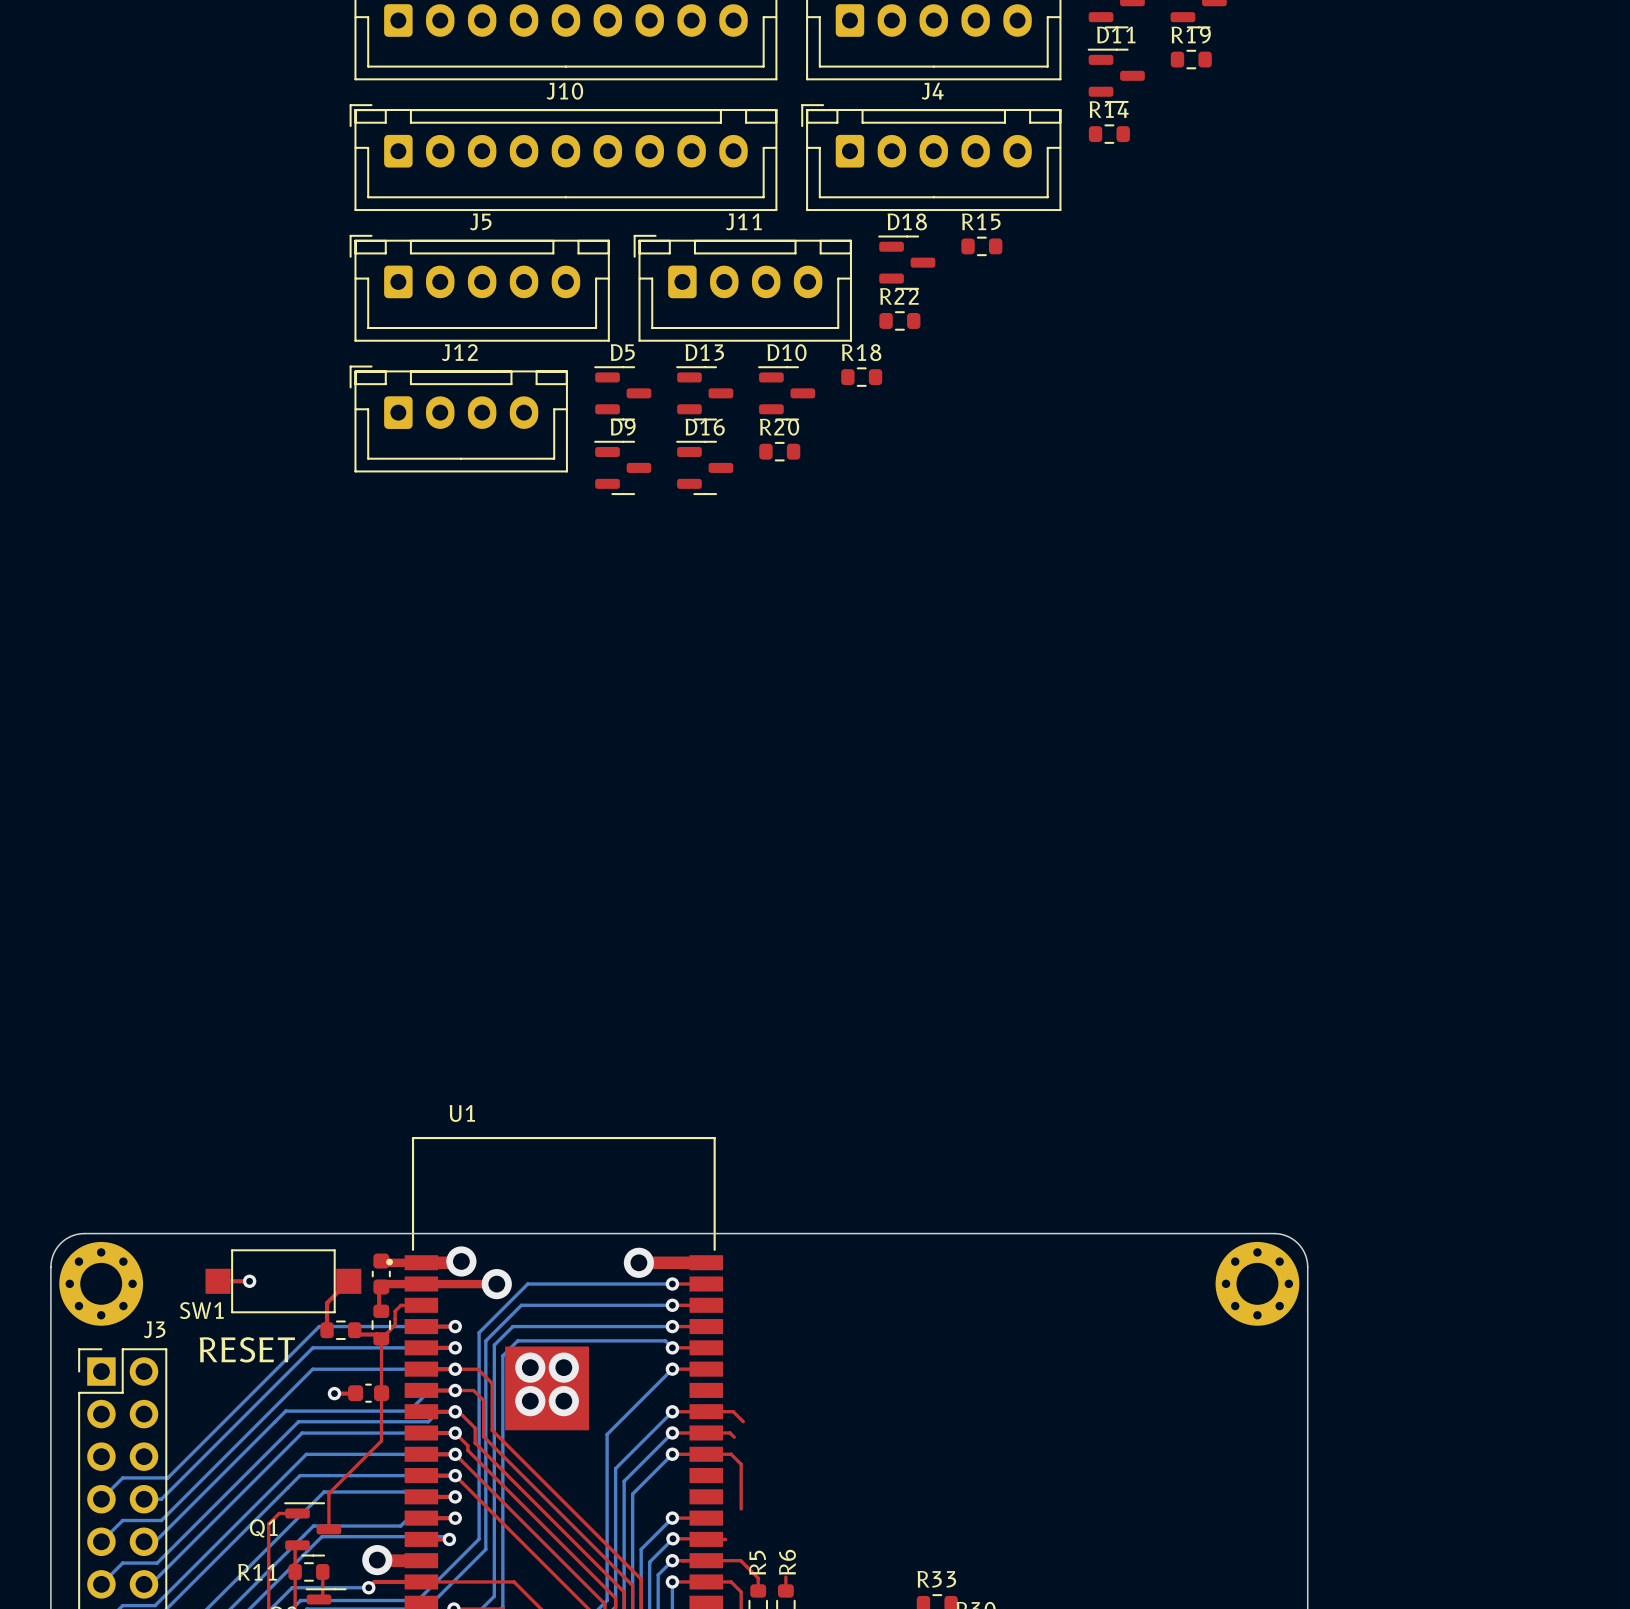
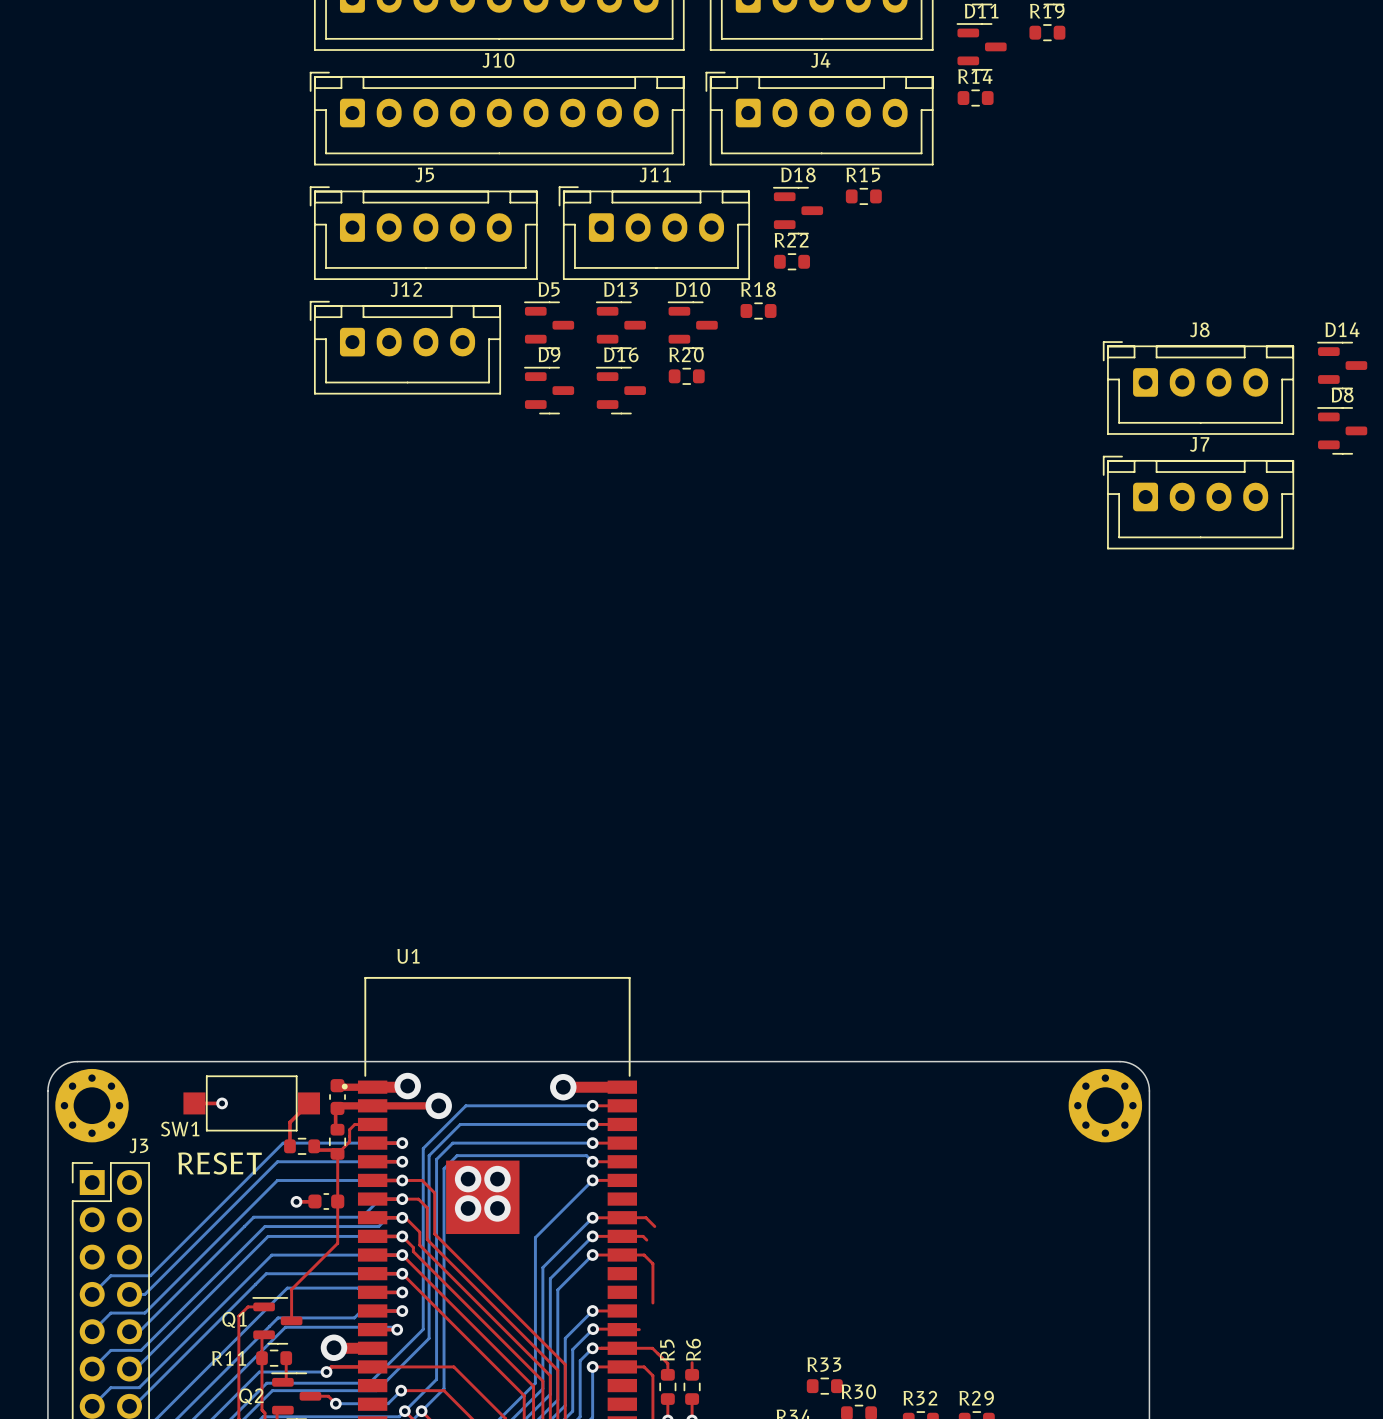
D14: none -> (1342, 365)
J8: none -> (1198, 388)
D8: none -> (1342, 430)
J7: none -> (1198, 502)

